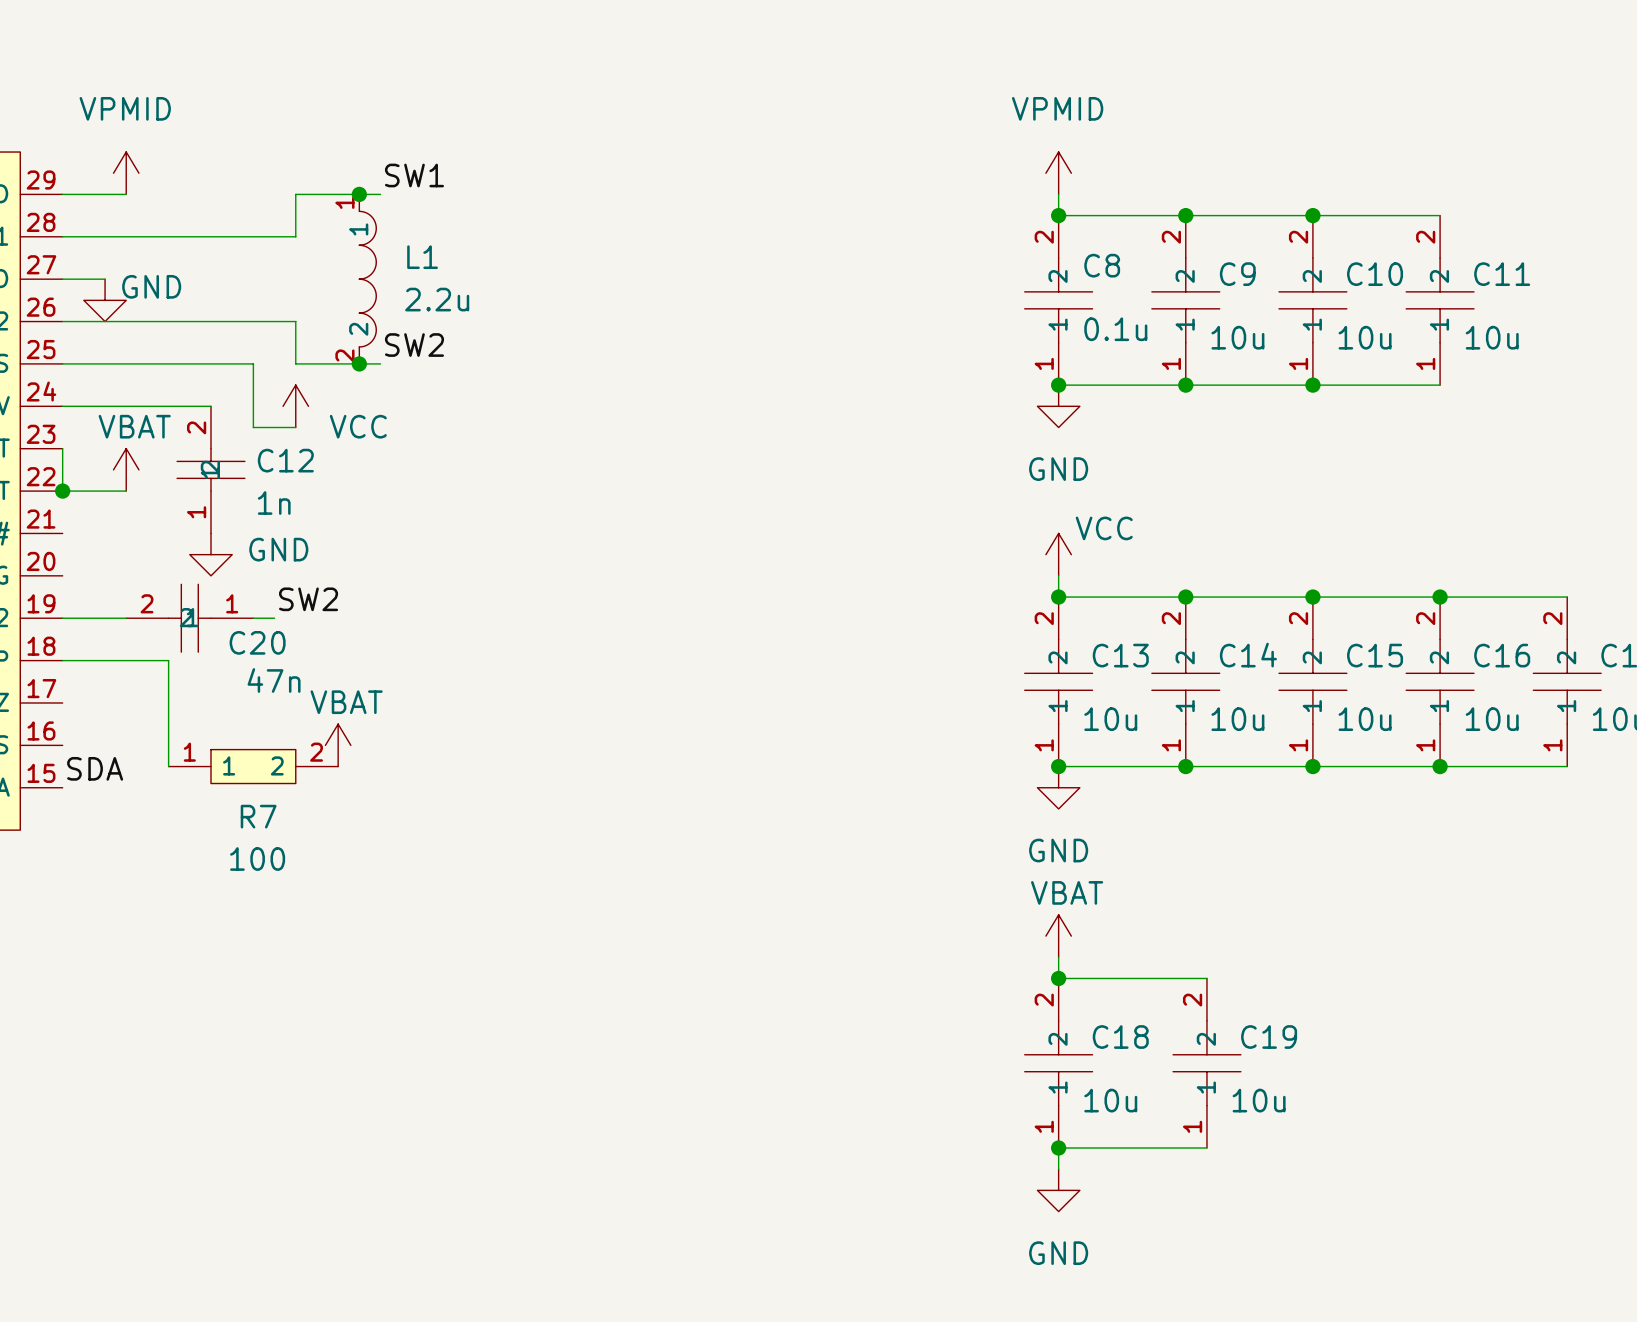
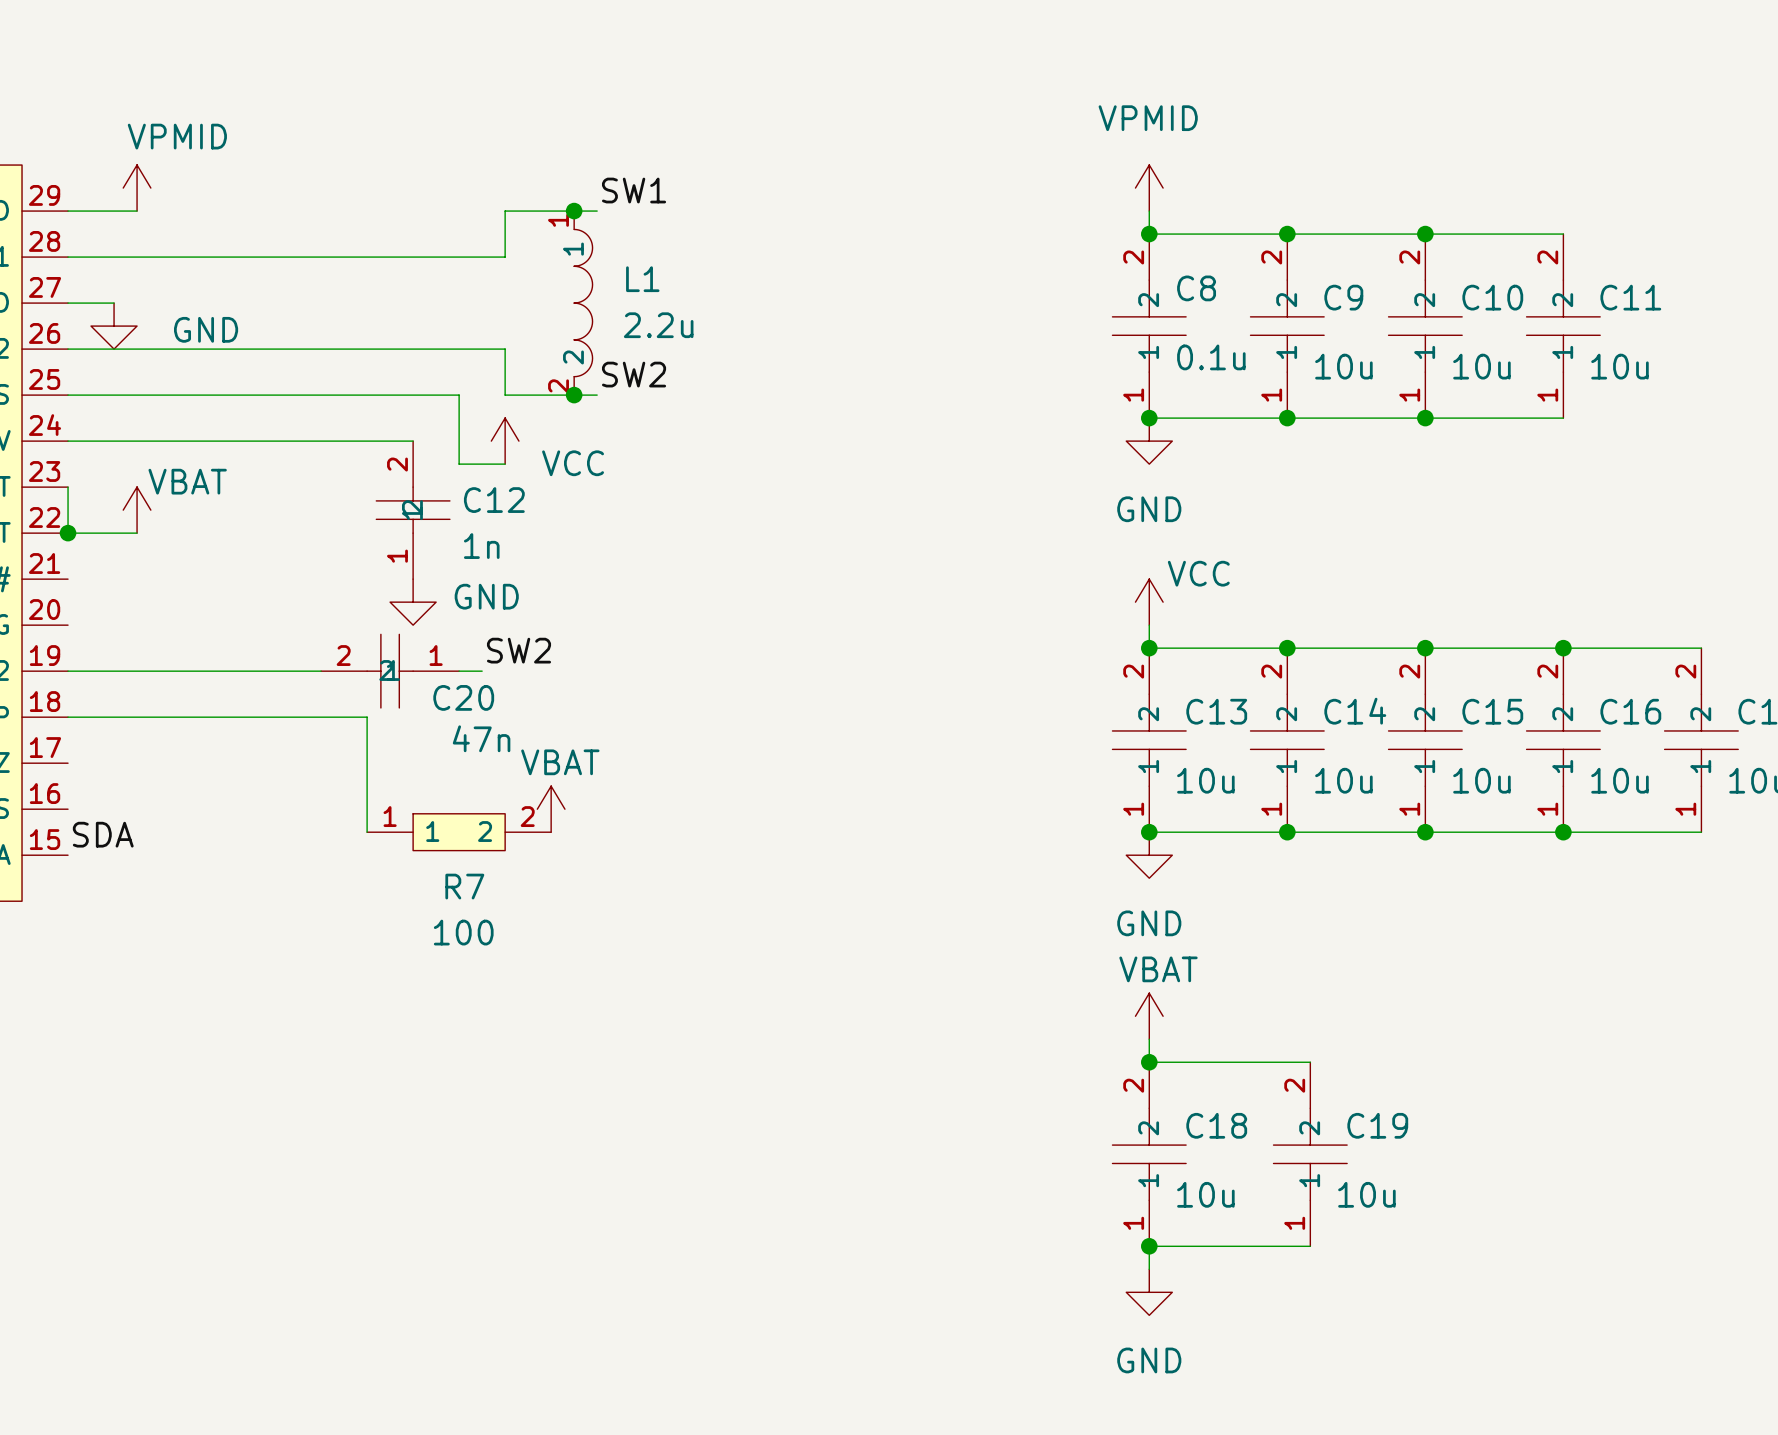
power symbol text position: VPMID (125, 108) -> VPMID (177, 136)
label position: SW1 (414, 175) -> SW1 (634, 190)
junction: (359, 194) -> none
wire: (380, 194) (295, 194) (295, 236) -> (597, 211) (505, 211) (505, 257) (321, 257)
junction: none -> (574, 211)
L1 position: (367, 279) -> (583, 303)
power symbol text position: GND (151, 286) -> GND (206, 329)
wire: (295, 321) (295, 363) -> (275, 395) (321, 395)
wire: none -> (321, 349) (505, 349) (505, 395) (597, 395)
label: SW2 (414, 345) -> none
label: none -> SW2 (634, 374)
wire: (253, 363) (253, 427) (295, 427) -> none
junction: (359, 363) -> none
wire: none -> (413, 395) (459, 395) (459, 464) (505, 464)
junction: none -> (574, 395)
wire: none -> (229, 441) (413, 441)
power symbol position: VCC (295, 406) -> VCC (505, 441)
power symbol text position: VBAT (134, 426) -> VBAT (187, 481)
C12 position: (211, 469) -> (413, 510)
power symbol position: GND (211, 554) -> GND (413, 602)
label: SW2 (308, 599) -> none
label: none -> SW2 (519, 650)
C20 position: (189, 618) -> (390, 671)
wire: none -> (298, 671) (321, 671)
wire: none -> (459, 671) (482, 671)
wire: (168, 660) (168, 766) -> (183, 717) (367, 717) (367, 832)
power symbol position: VBAT (338, 745) -> VBAT (551, 809)
R7 position: (253, 766) -> (459, 832)

